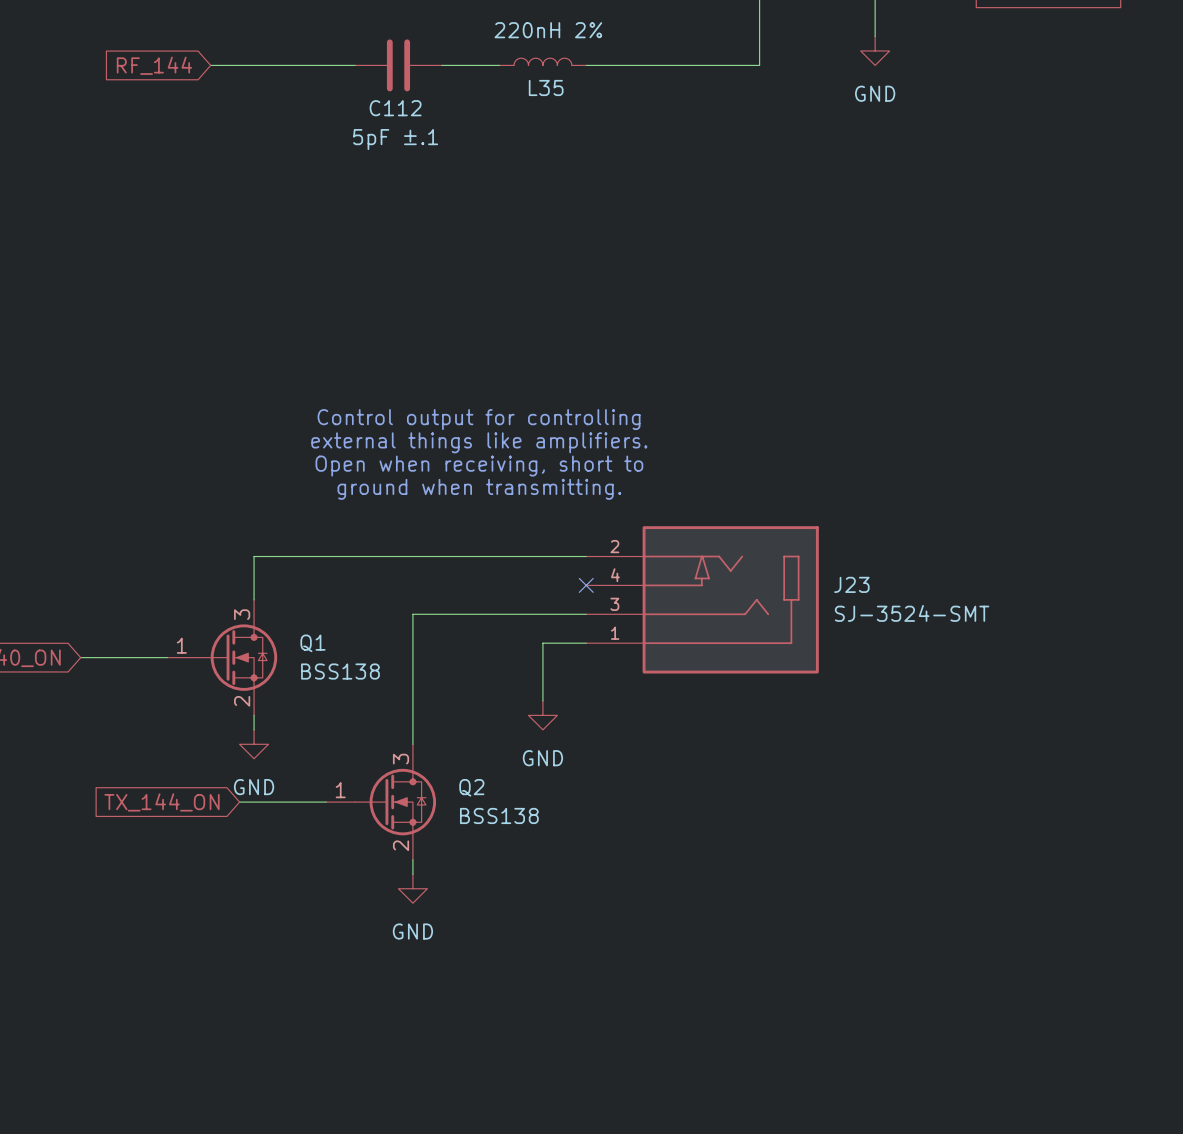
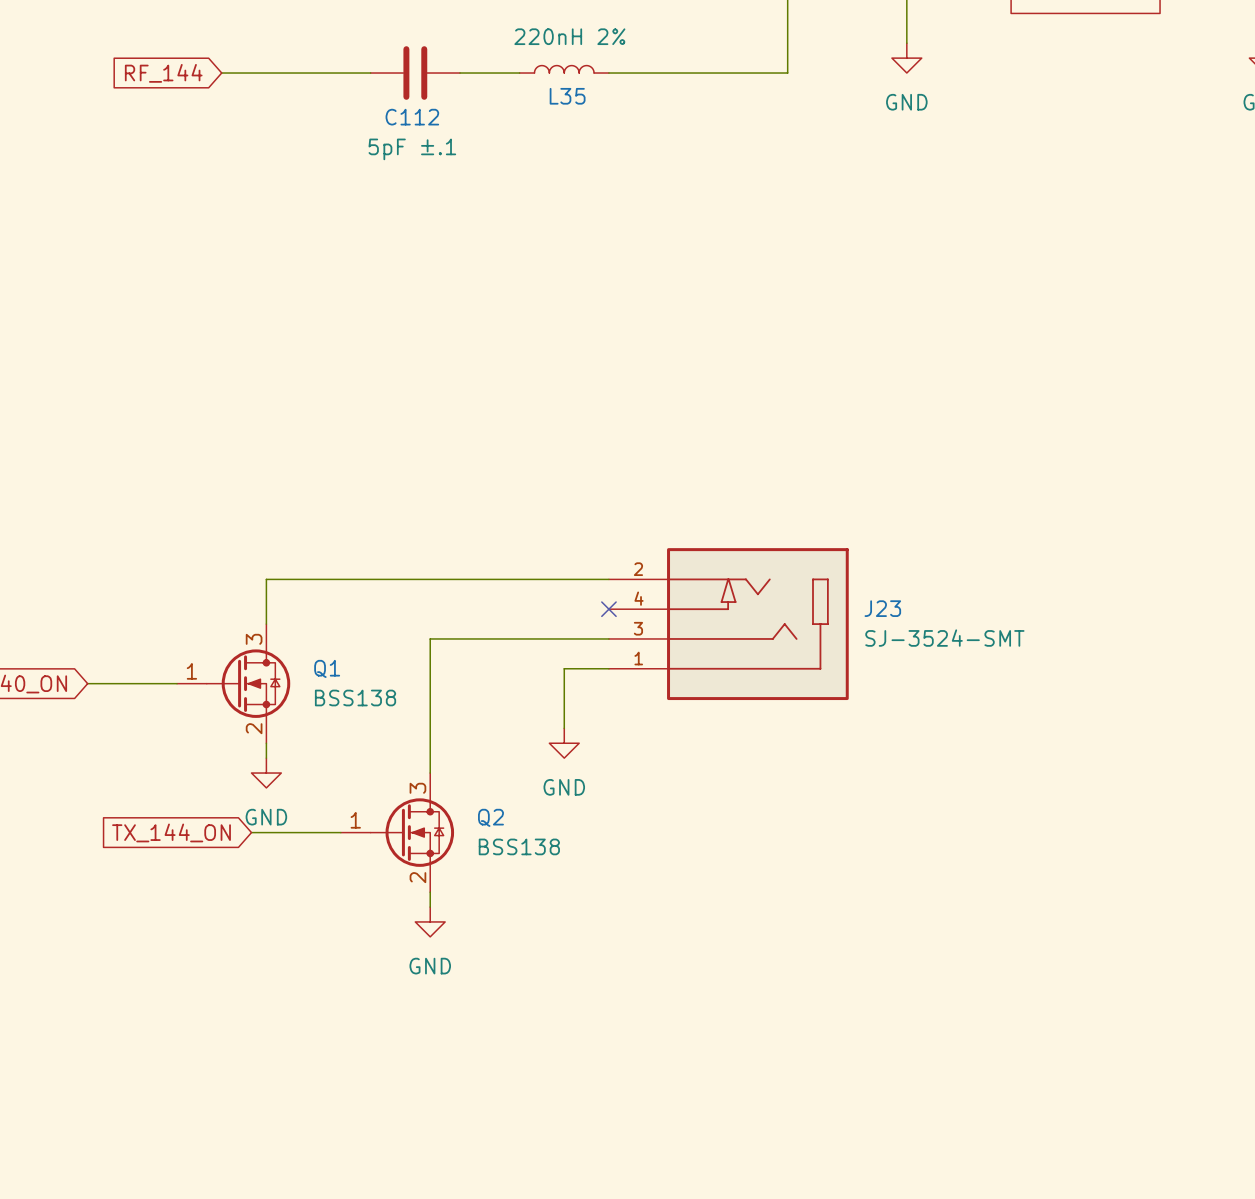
text: Control output for controlling (479, 419) -> none
text: external things like amplifiers. (479, 442) -> none
text: Open when receiving, short to (479, 466) -> none
text: ground when transmitting. (479, 489) -> none

